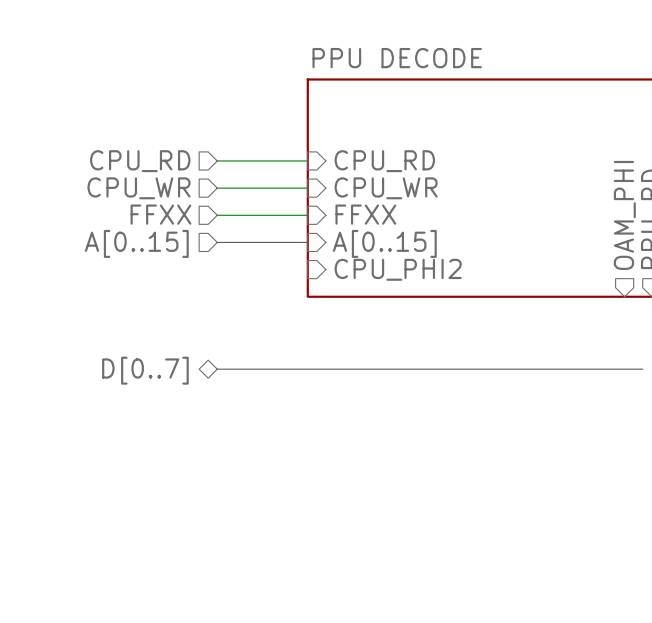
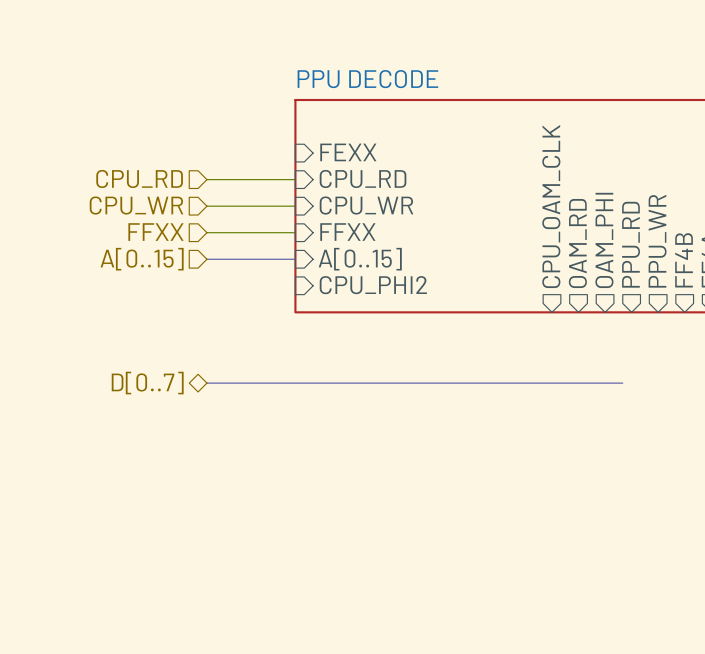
sheet pin: none -> FEXX (348, 152)
sheet pin: none -> CPU_OAM_CLK (551, 206)
sheet pin: none -> OAM_RD (577, 243)

